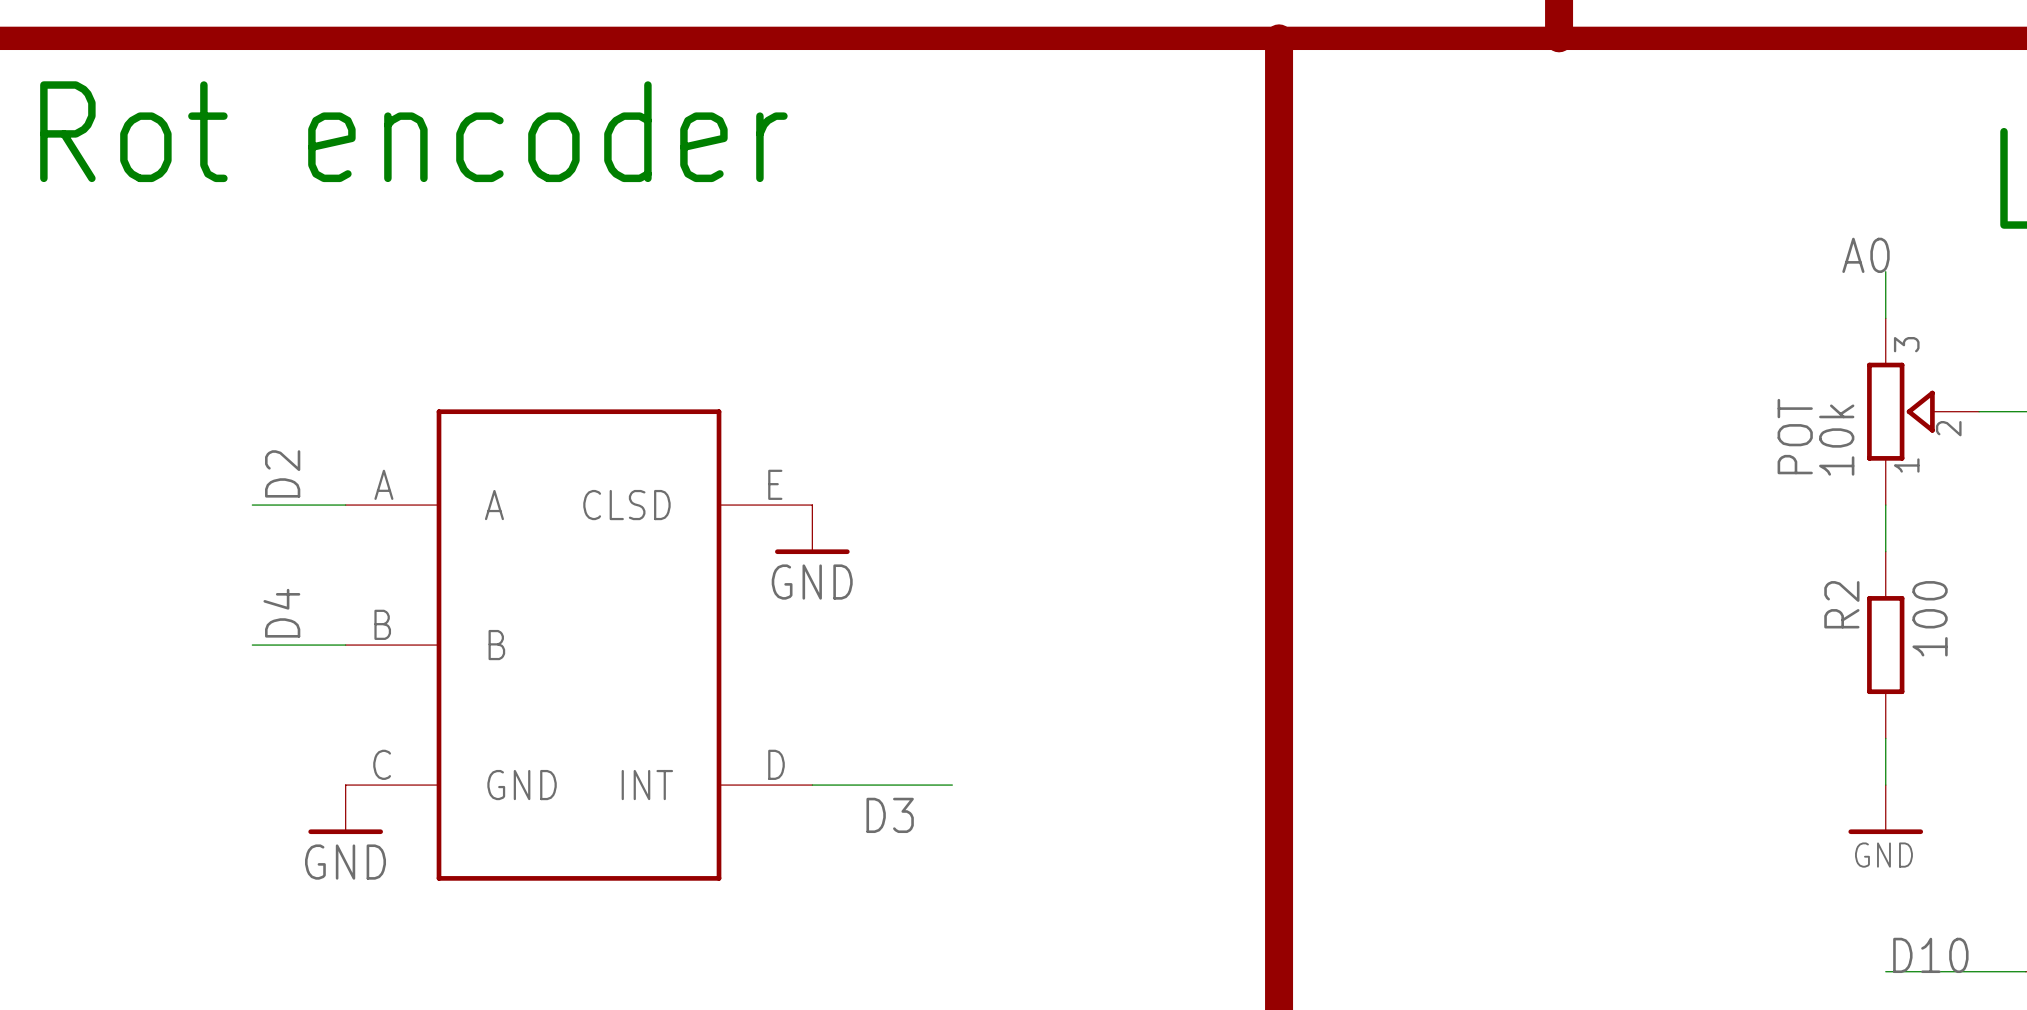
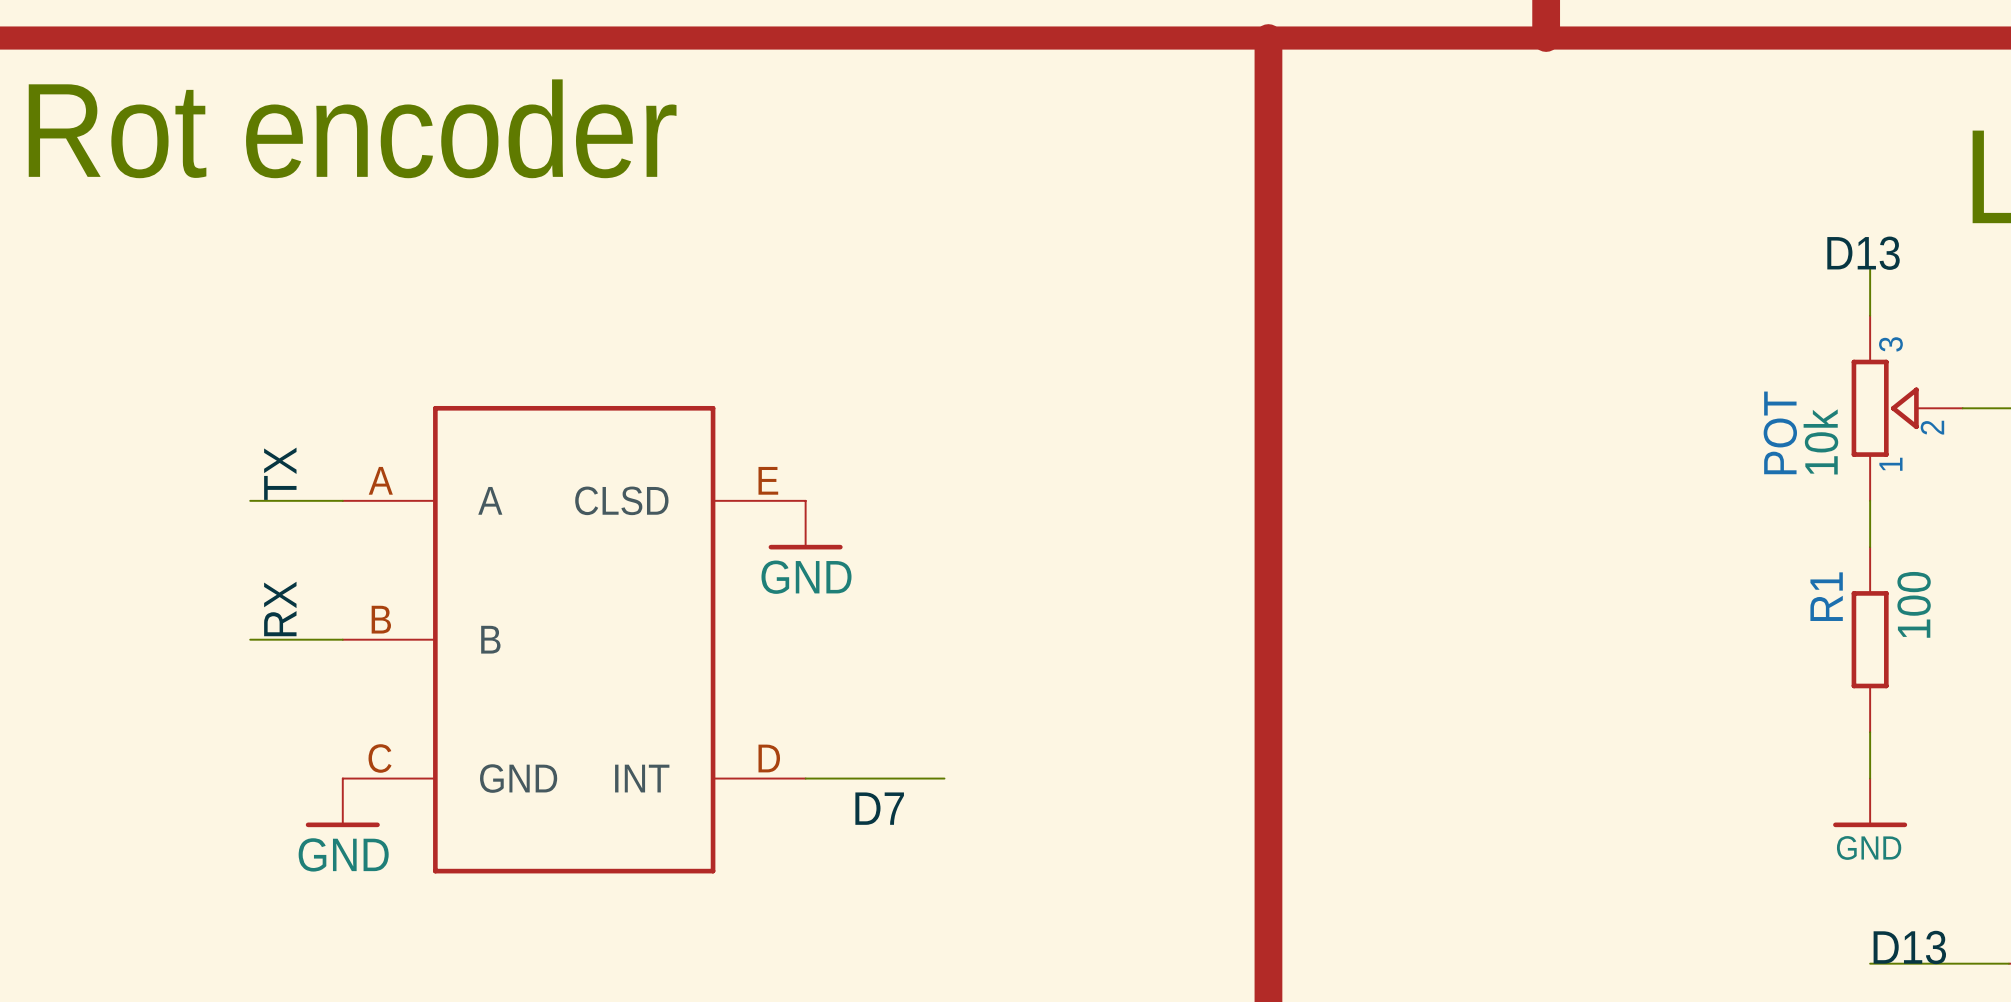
label: A0 (1865, 255) -> D13 (1863, 253)
label: D2 (282, 473) -> TX (280, 473)
R2 name: R2 (1841, 604) -> R1 (1826, 596)
label: D4 (281, 613) -> RX (280, 608)
label: D3 (890, 815) -> D7 (879, 808)
label: D10 (1930, 955) -> D13 (1909, 947)

